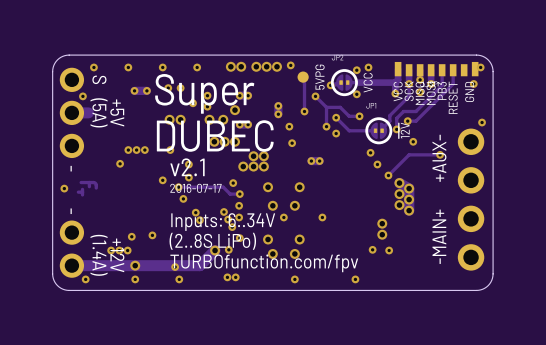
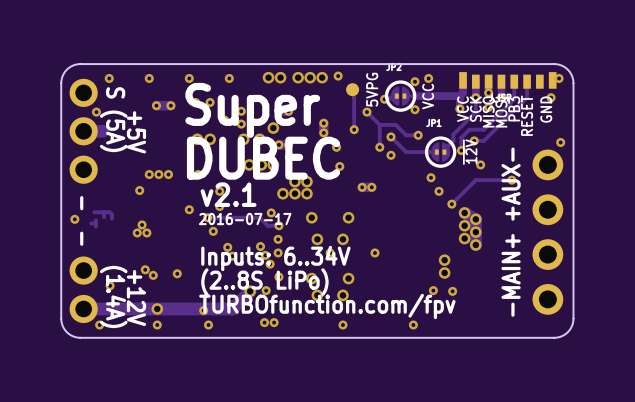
via: none -> (142, 224)
via: none -> (137, 232)
via: none -> (146, 232)
via: none -> (145, 269)
via: none -> (110, 285)
via: (111, 250) -> none
via: (119, 250) -> none
via: (127, 250) -> none

